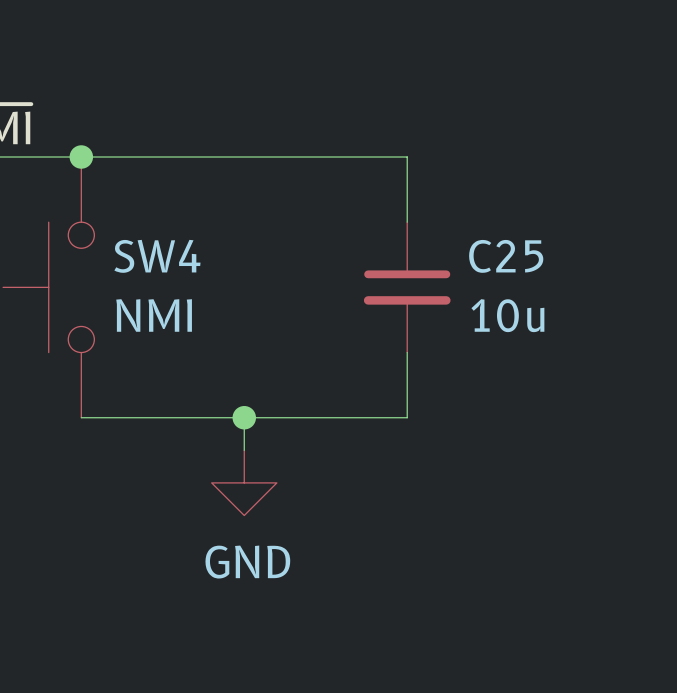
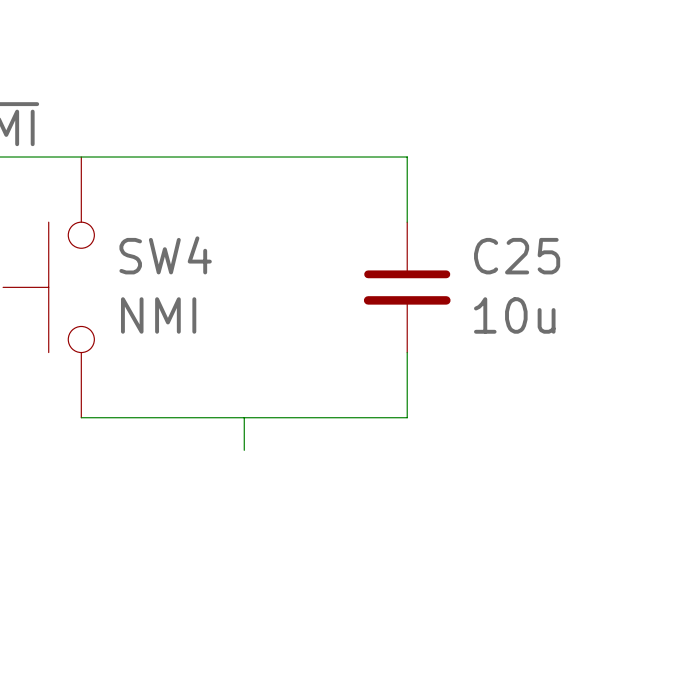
junction: (81, 157) -> none
junction: (244, 417) -> none
power symbol: GND (244, 482) -> none

